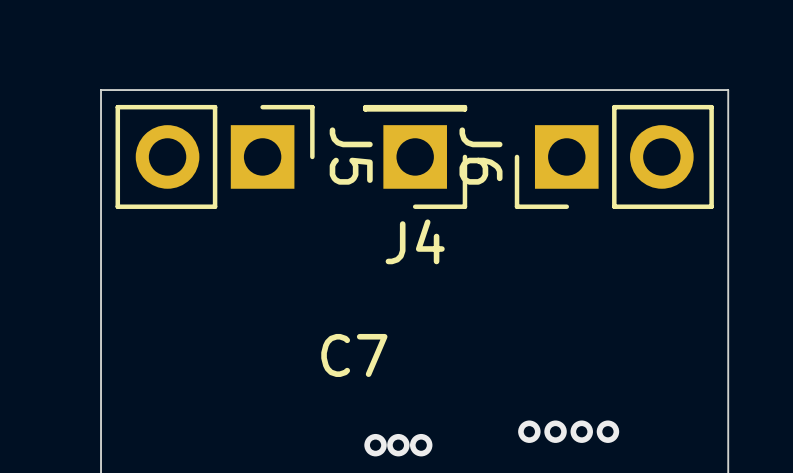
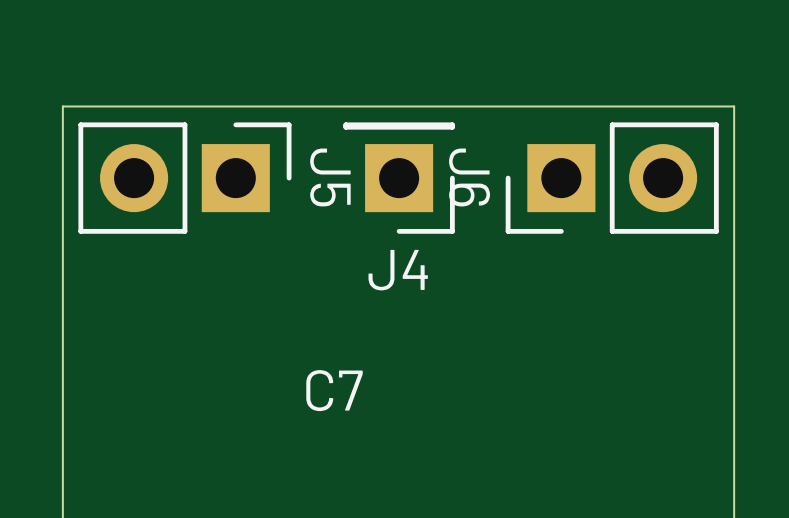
via: (529, 431) -> none
via: (555, 431) -> none
via: (581, 431) -> none
via: (607, 431) -> none
via: (375, 445) -> none
via: (398, 445) -> none
via: (421, 445) -> none

